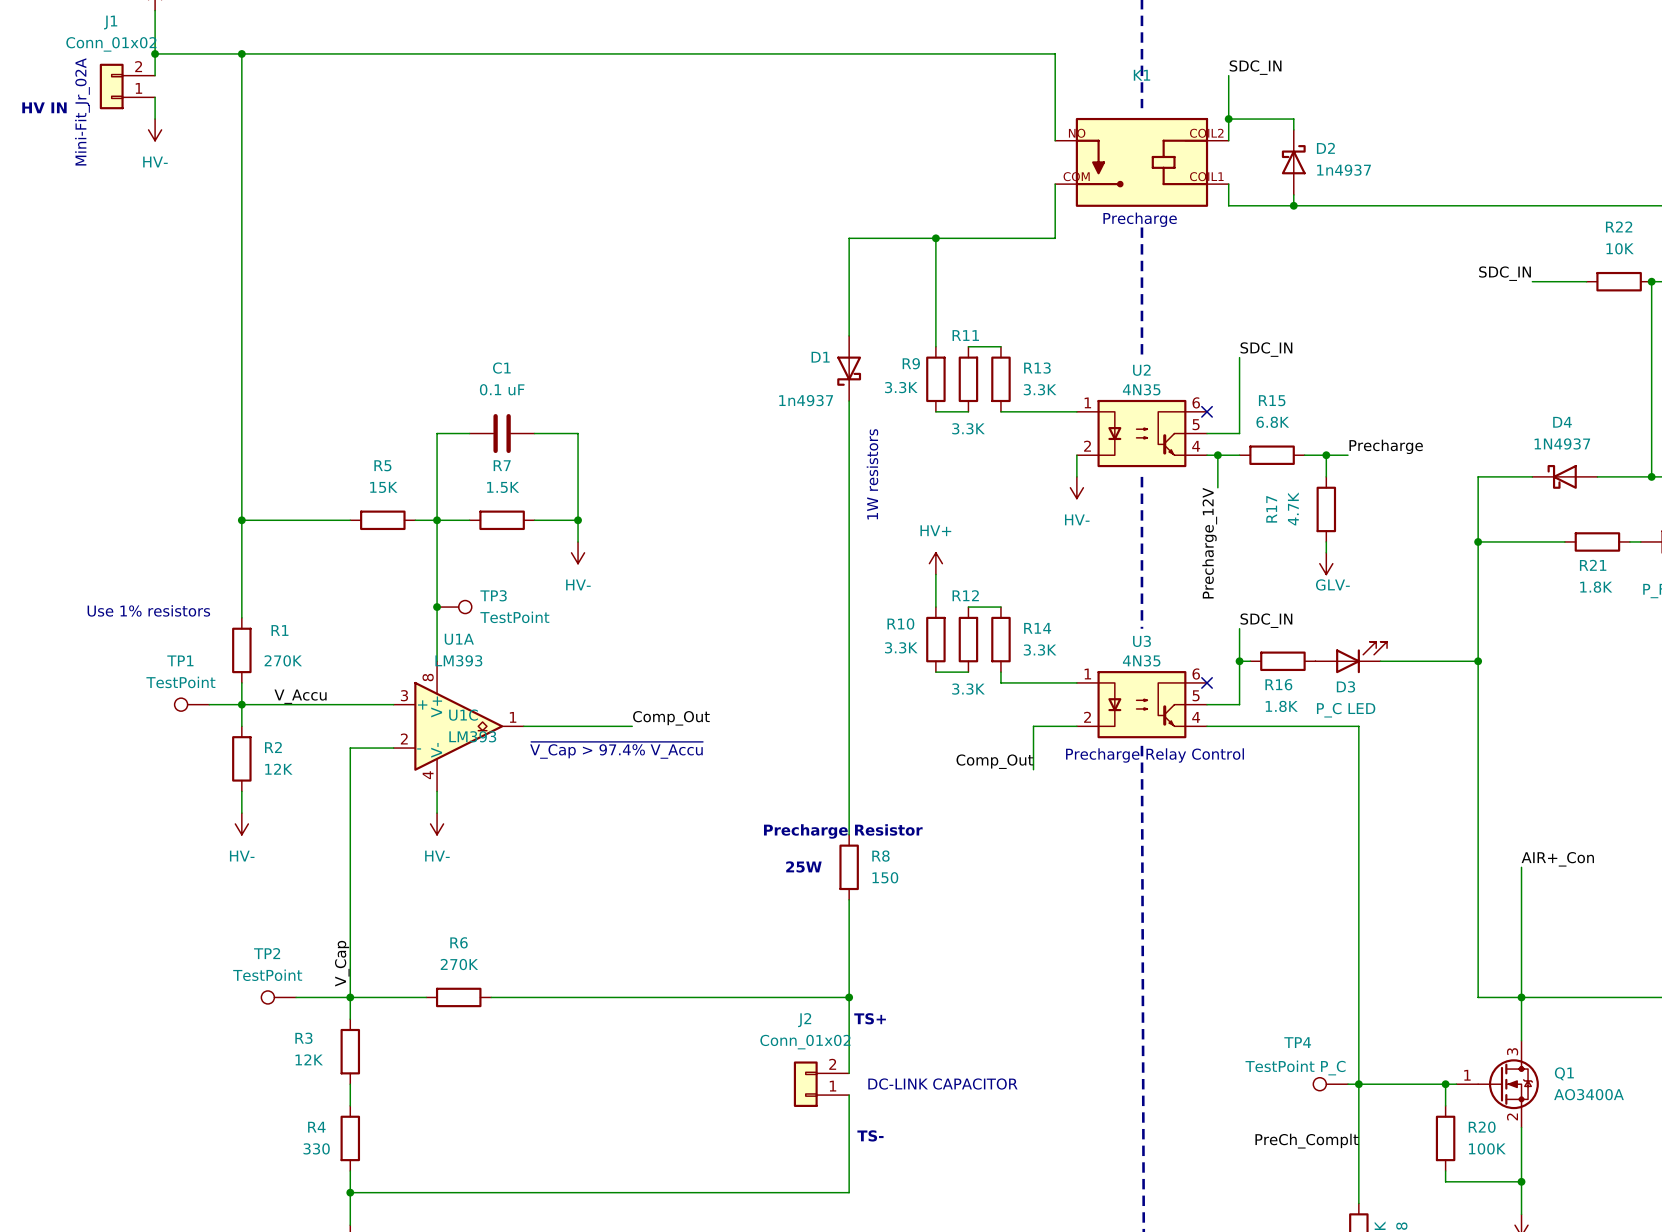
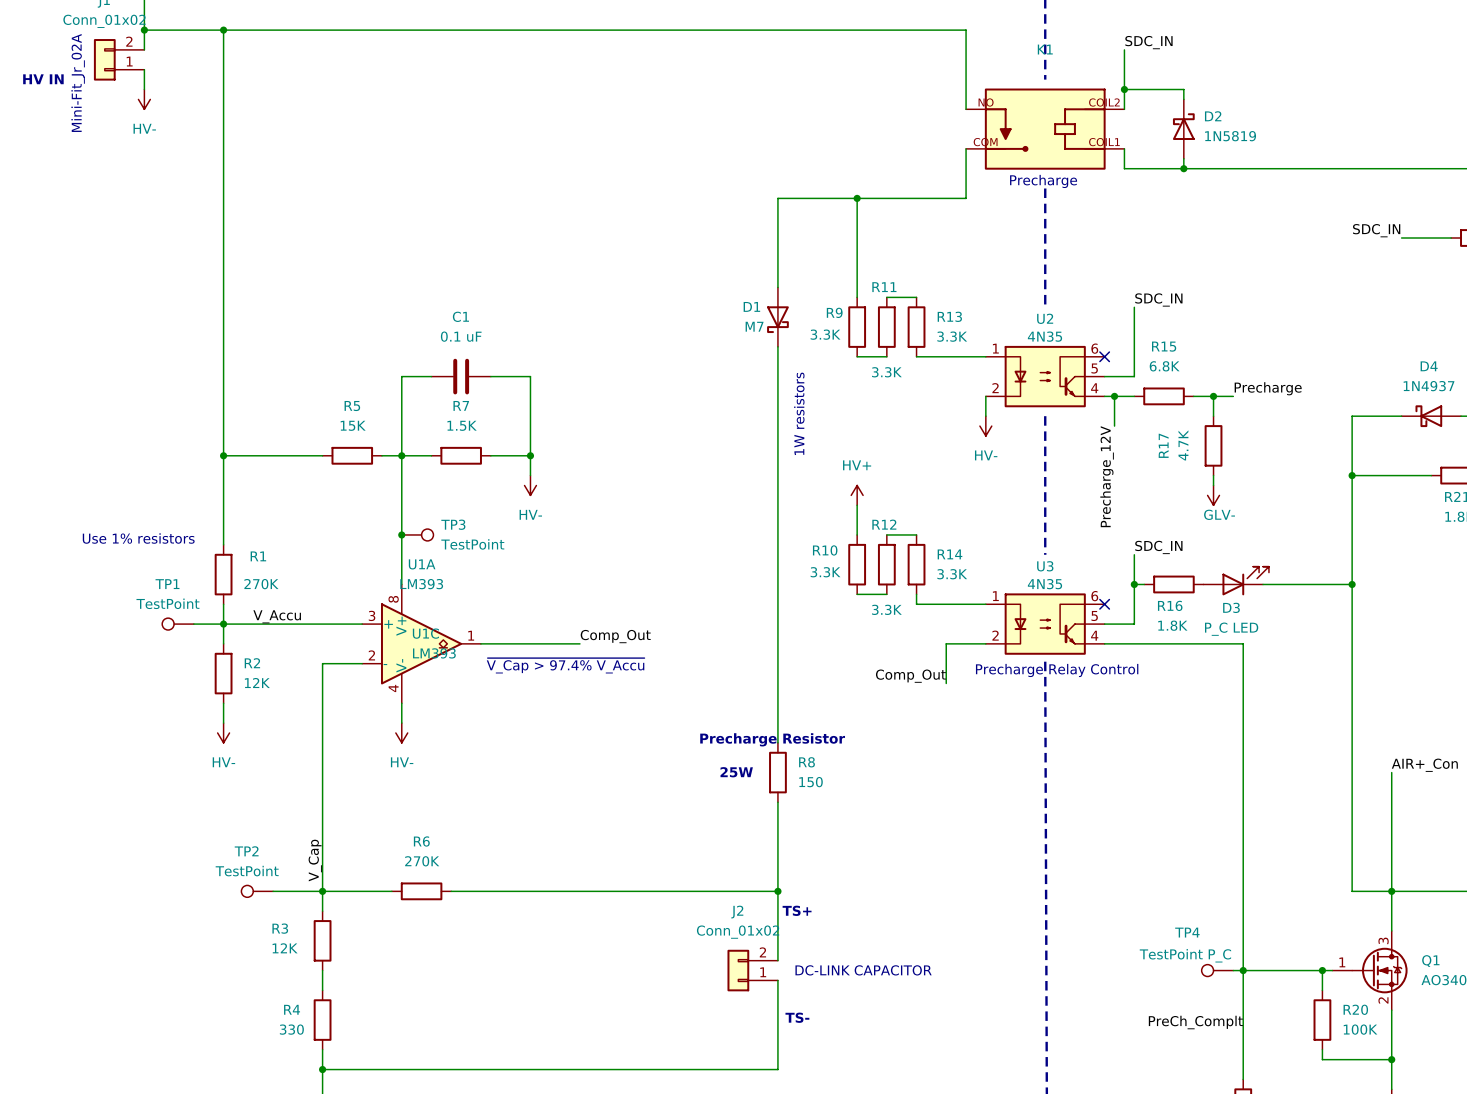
D2 value: 1n4937 (1344, 170) -> 1N5819 (1230, 136)
D1 value: 1n4937 (806, 400) -> M7 (754, 326)

